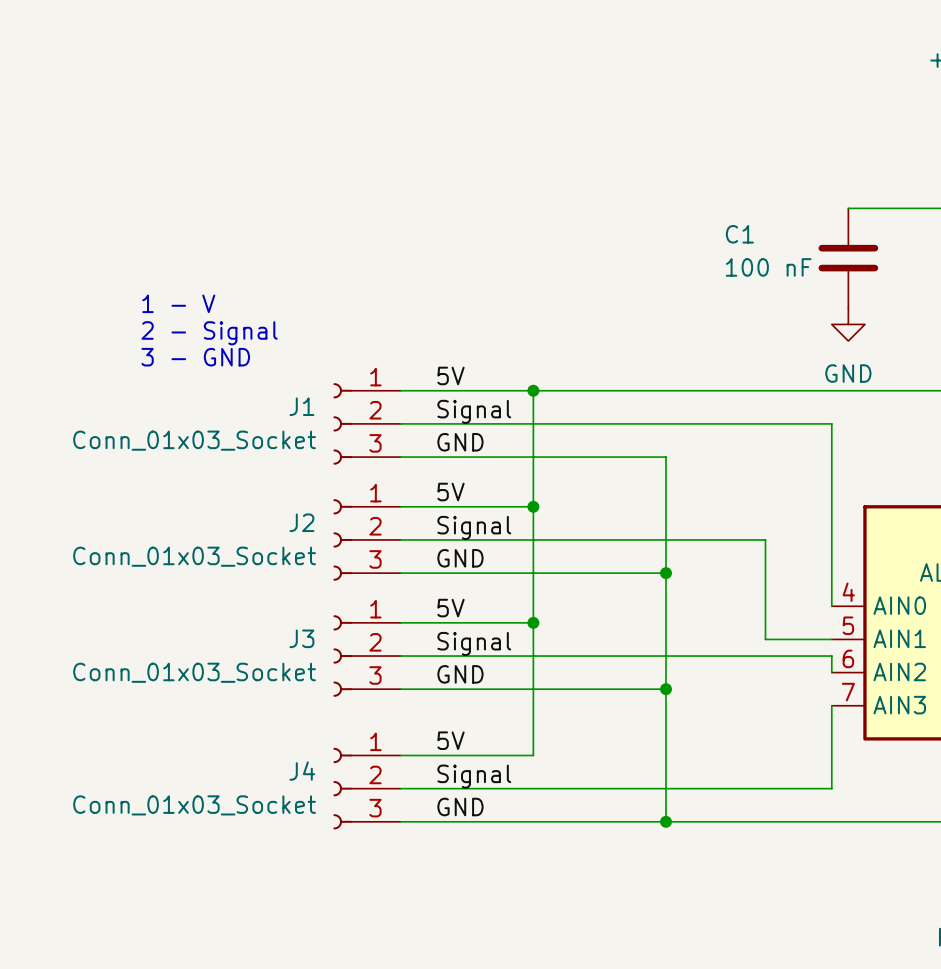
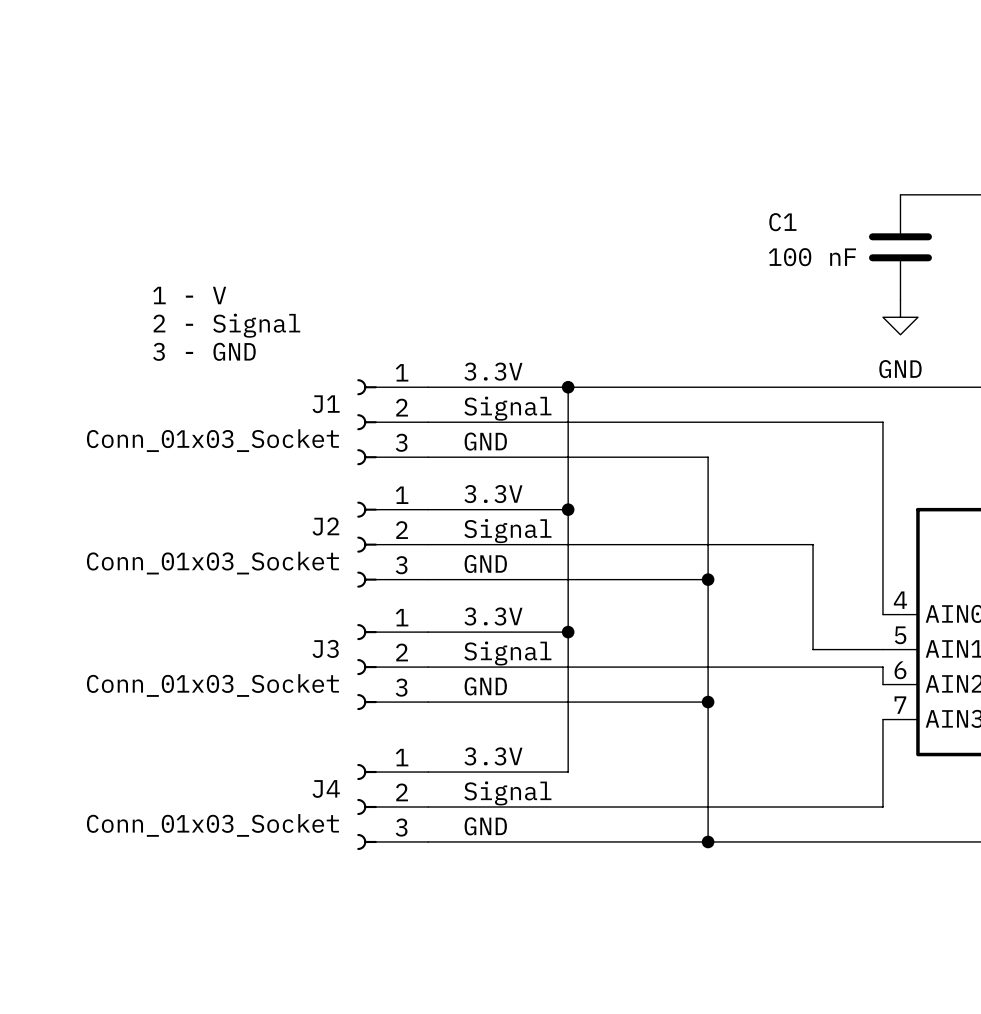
label: 5V (450, 375) -> 3.3V (493, 371)
label: 5V (450, 492) -> 3.3V (493, 494)
label: 5V (450, 608) -> 3.3V (493, 616)
label: 5V (450, 740) -> 3.3V (493, 756)

